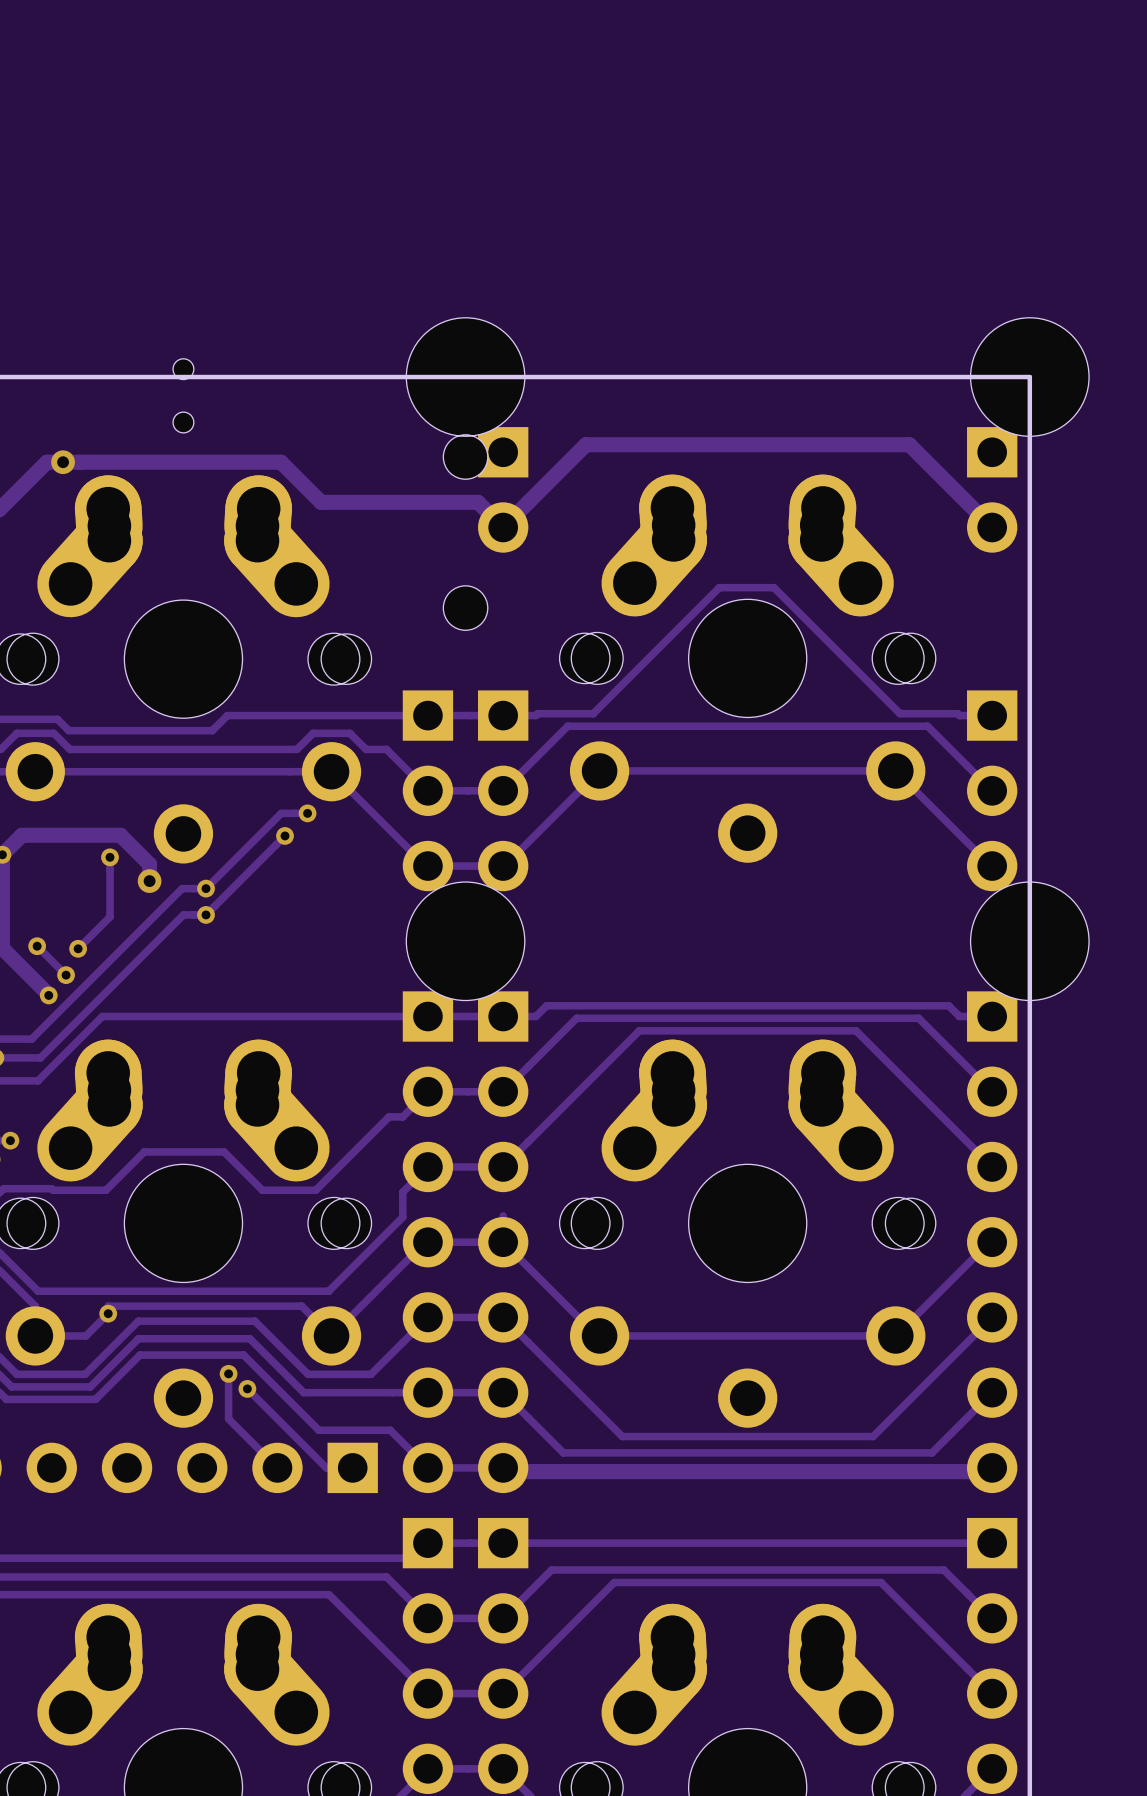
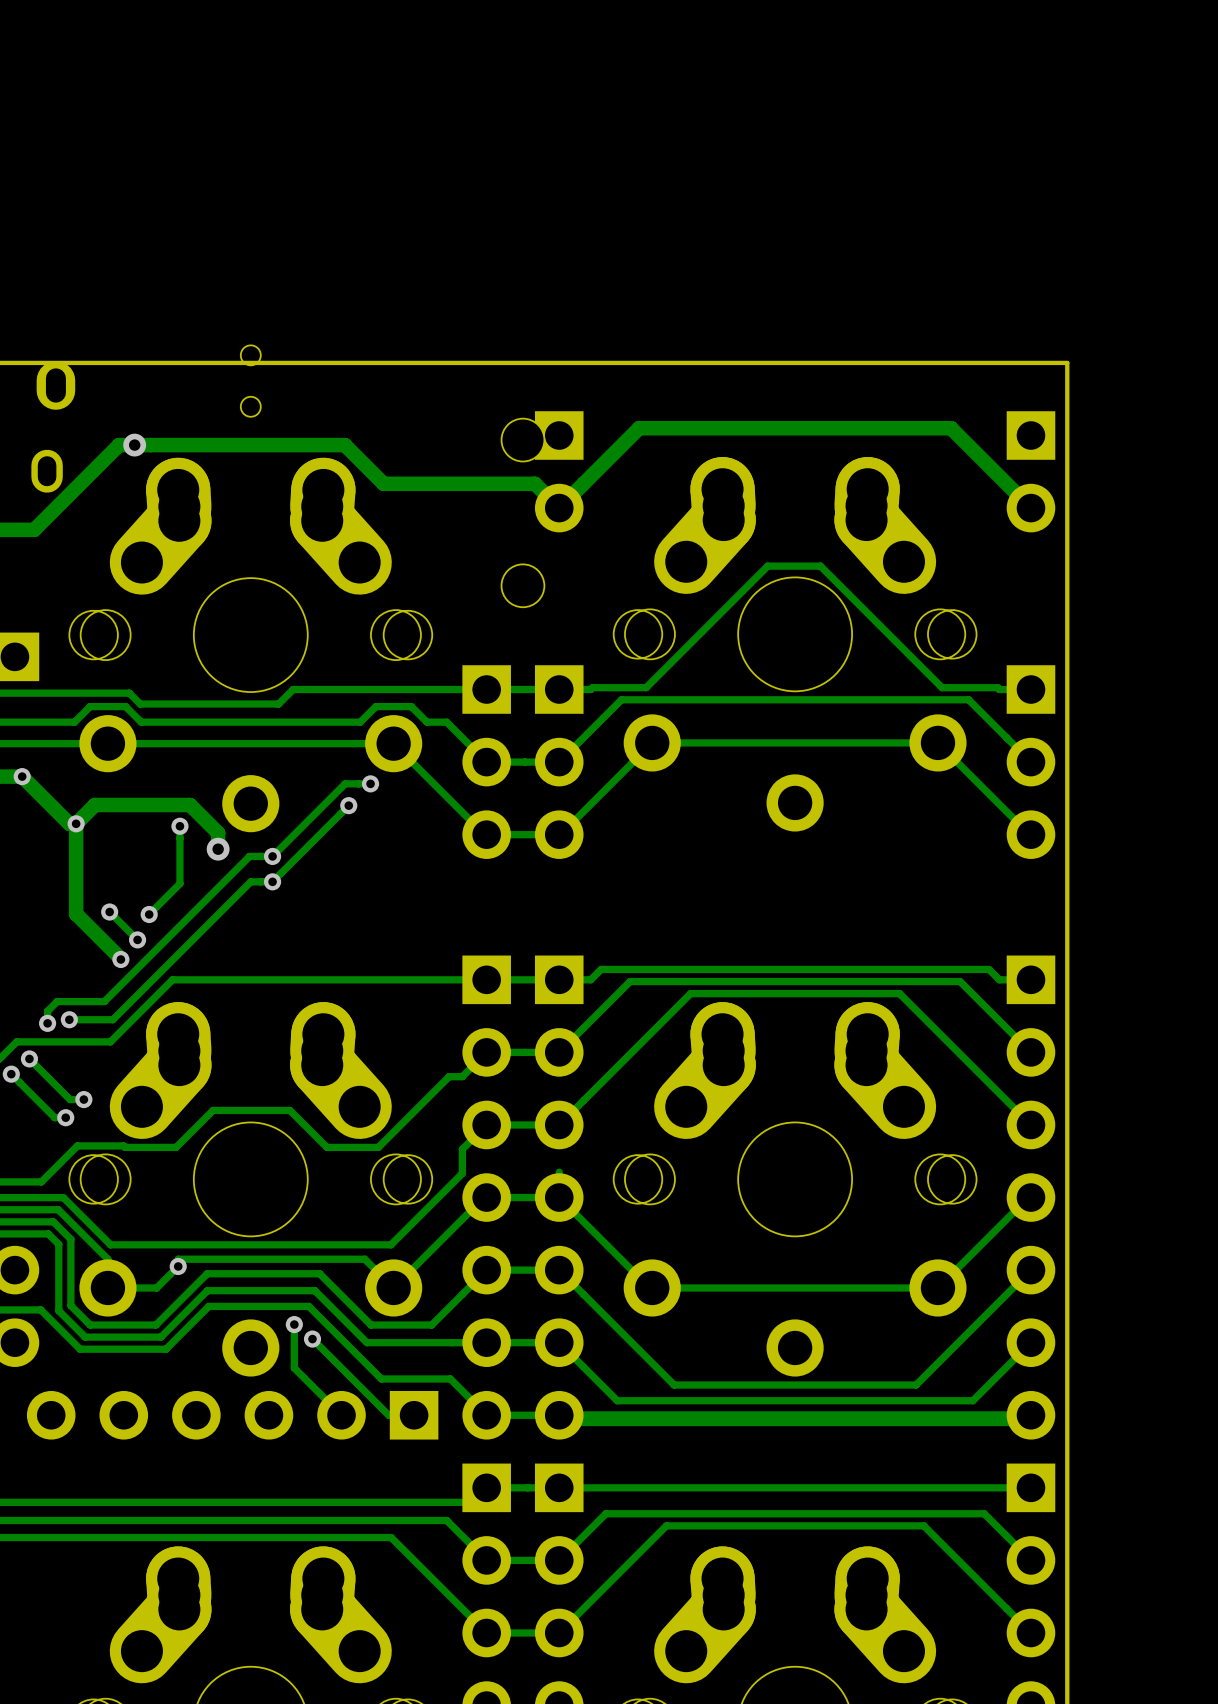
part: (465, 377) -> none
part: (1029, 377) -> none
part: (465, 941) -> none
part: (1029, 941) -> none

